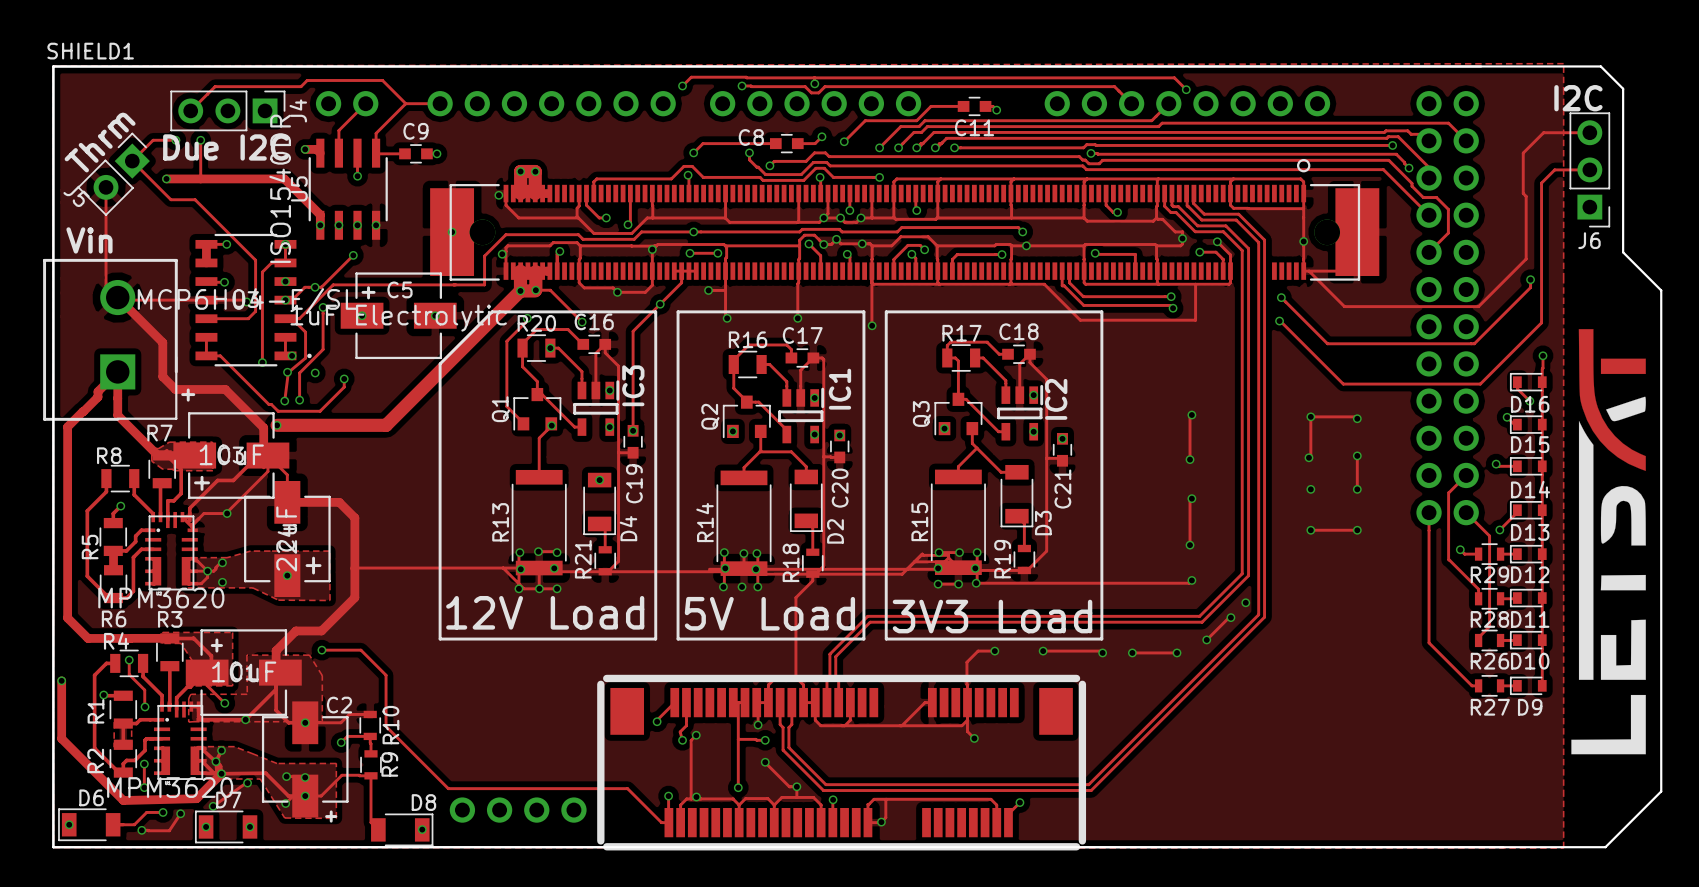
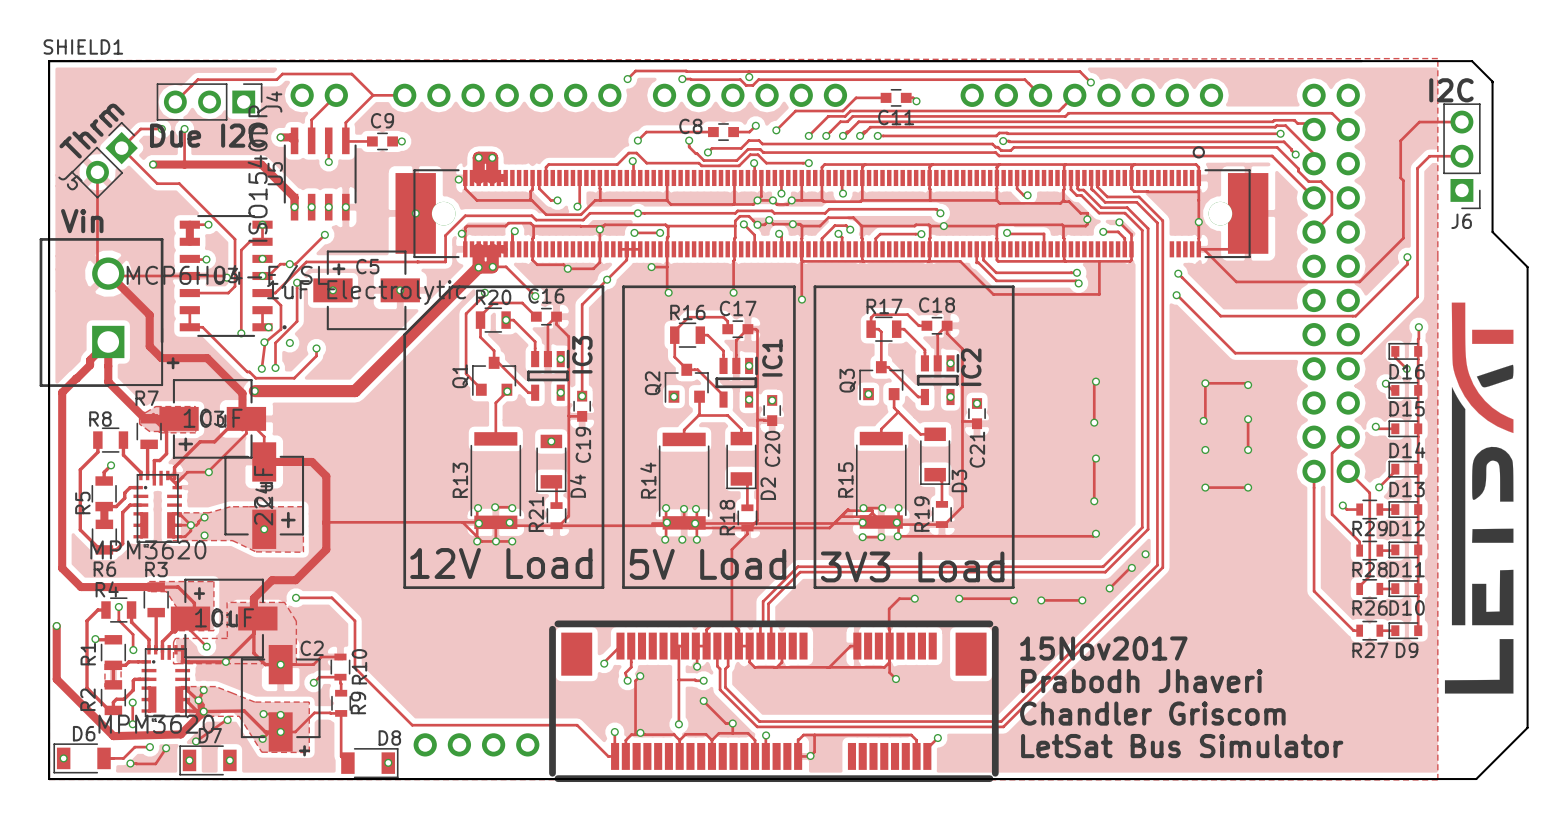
text: none -> 15Nov2017 (1103, 648)
text: none -> Prabodh Jhaveri (1141, 681)
text: none -> Chandler Griscom (1152, 713)
text: none -> LetSat Bus Simulator (1182, 746)

